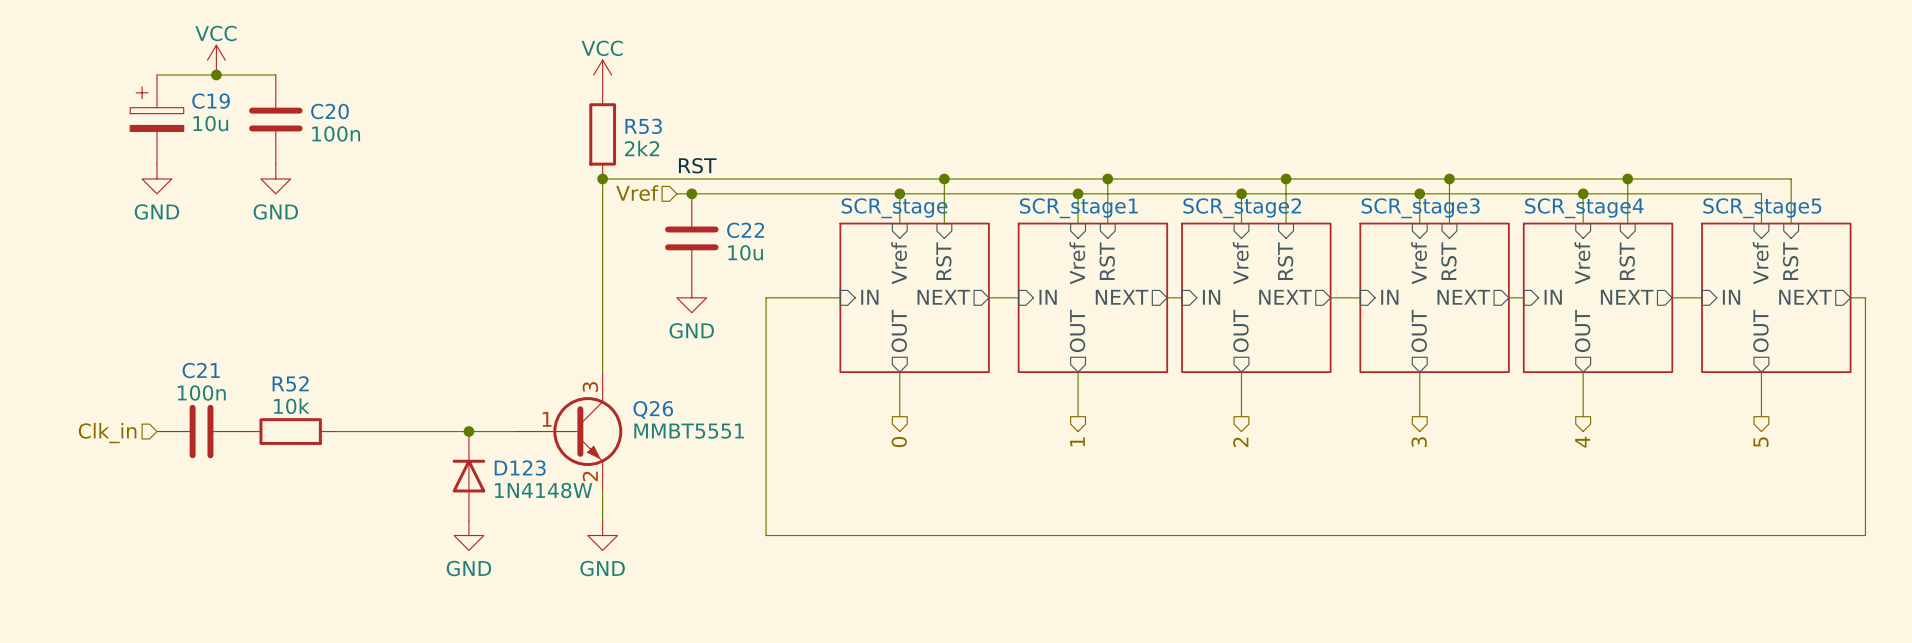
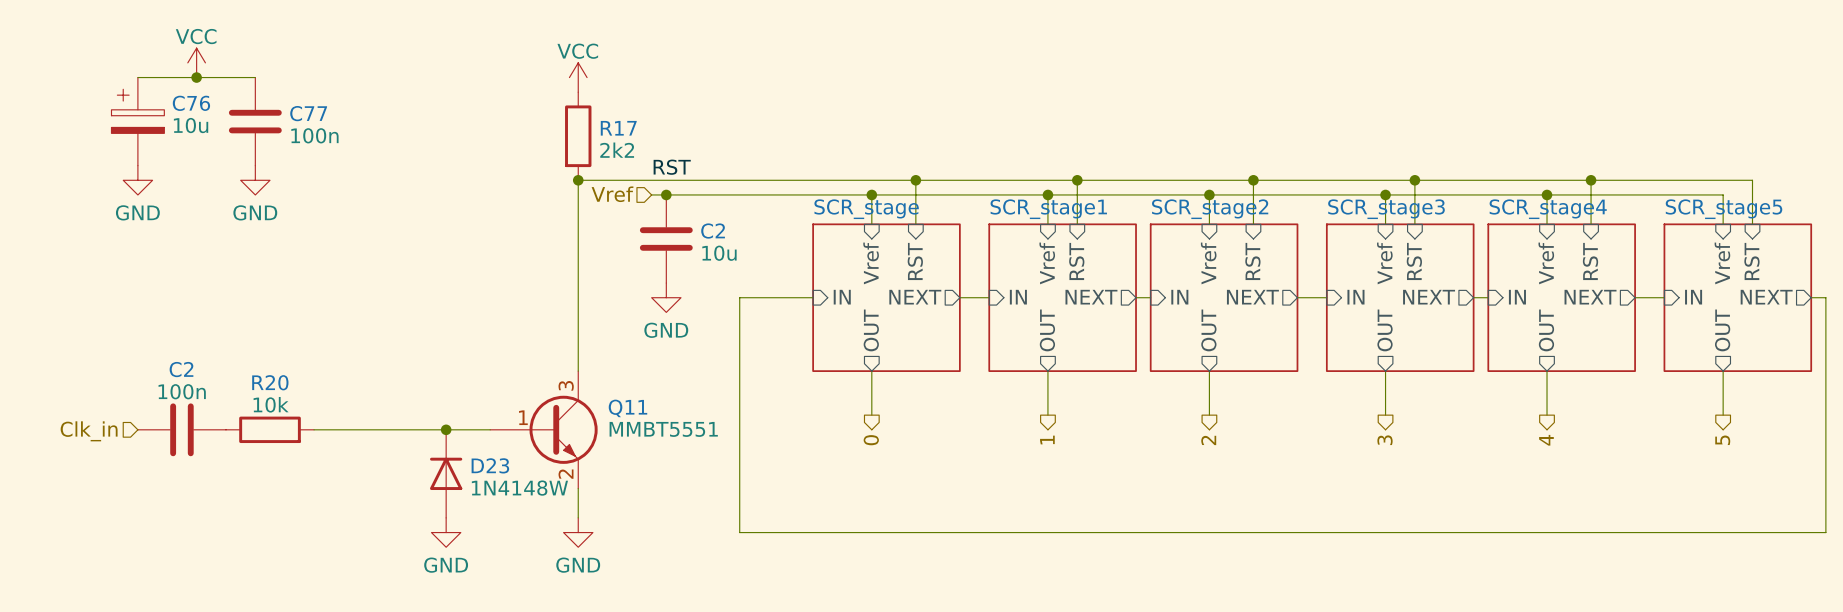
C19 name: C19 (211, 101) -> C76 (191, 103)
C20 name: C20 (329, 111) -> C77 (308, 113)
R53 name: R53 (643, 126) -> R17 (618, 128)
C22 name: C22 (745, 230) -> C2 (713, 231)
C21 name: C21 (201, 370) -> C2 (181, 369)
R52 name: R52 (290, 383) -> R20 (270, 382)
Q26 name: Q26 (653, 409) -> Q11 (627, 408)
D123 name: D123 (520, 468) -> D23 (490, 465)

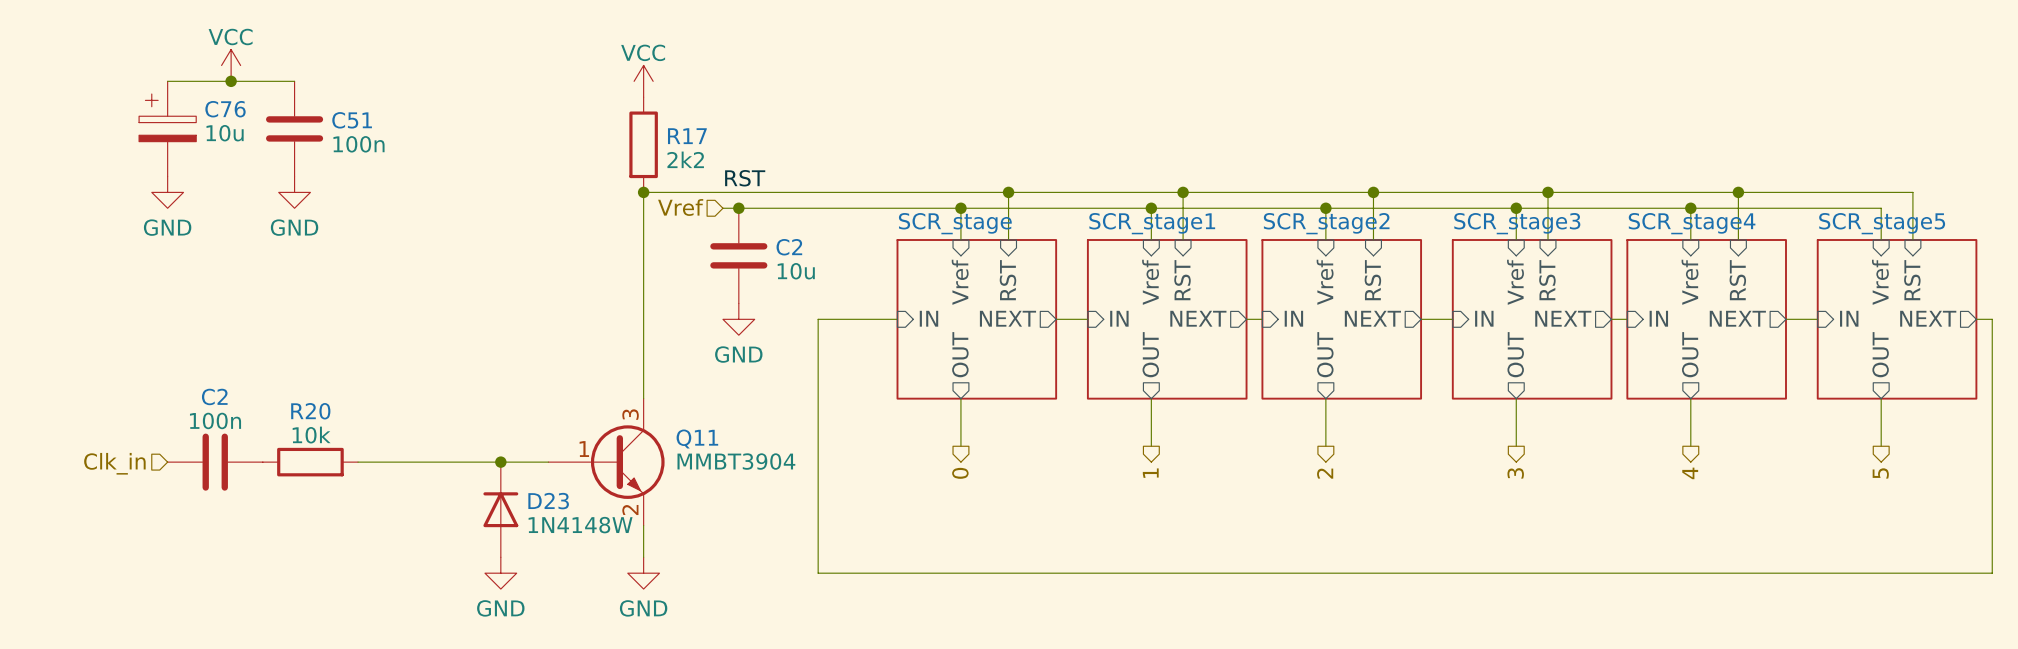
C77 name: C77 (308, 113) -> C51 (352, 120)
Q11 value: MMBT5551 (663, 429) -> MMBT3904 (736, 461)

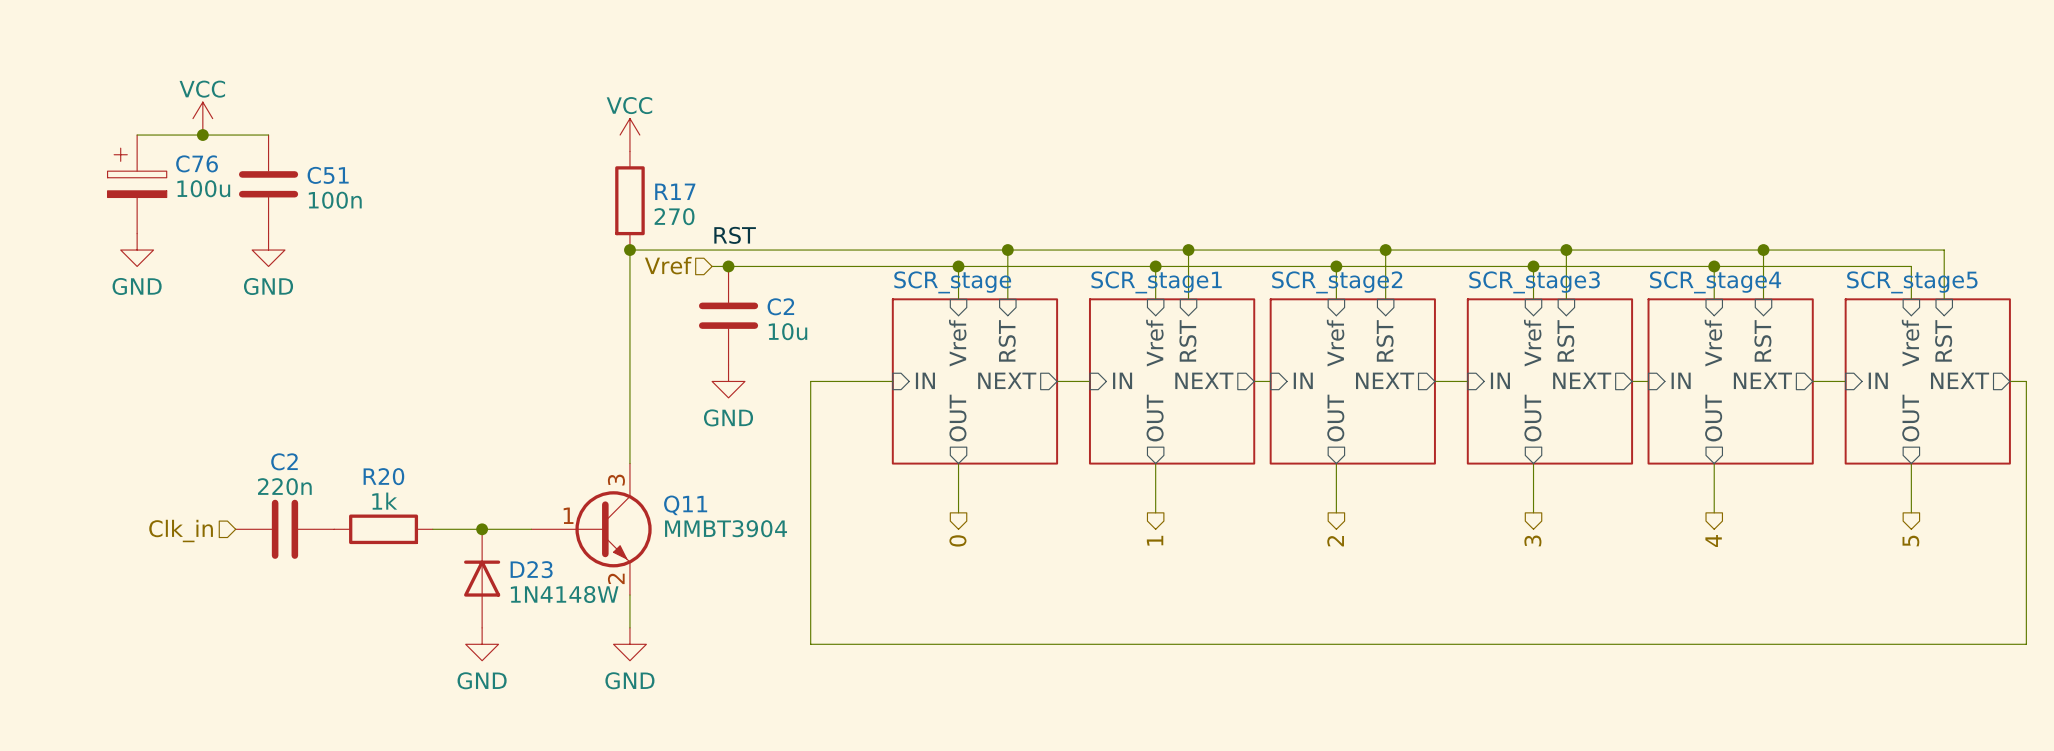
C76 value: 10u (225, 133) -> 100u (203, 188)
R17 value: 2k2 (685, 159) -> 270 (674, 216)
R20 value: 10k (311, 435) -> 1k (384, 501)
C2: 100n (215, 462) -> none
R20 position: (310, 462) -> (383, 529)
C2: none -> 220n (284, 529)
wire: (358, 462) (453, 462) -> none
hierarchical label position: Clk_in (114, 463) -> Clk_in (181, 531)

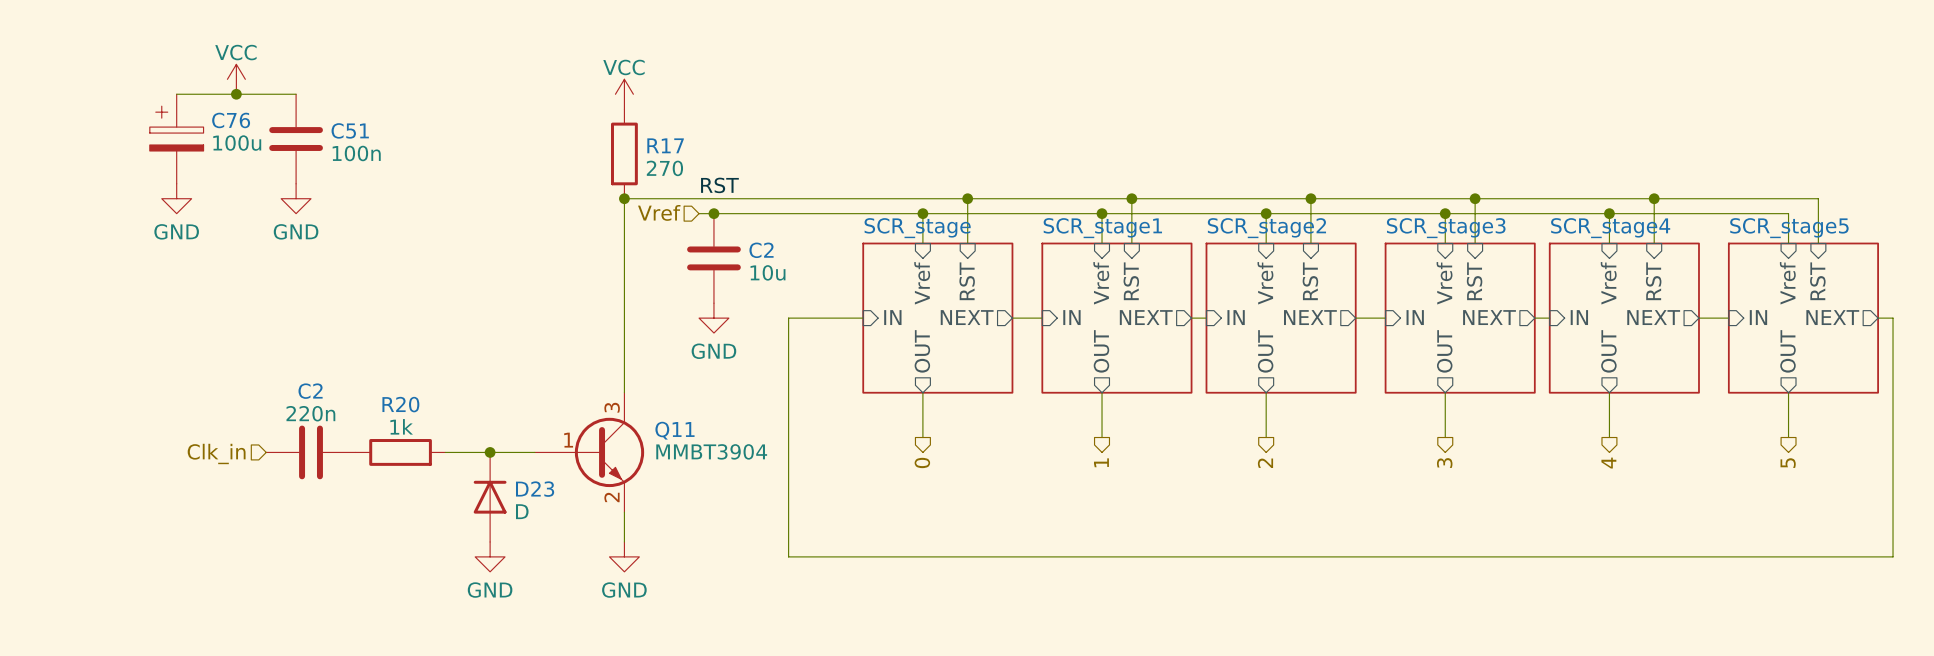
D23 value: 1N4148W (564, 594) -> D (522, 511)

